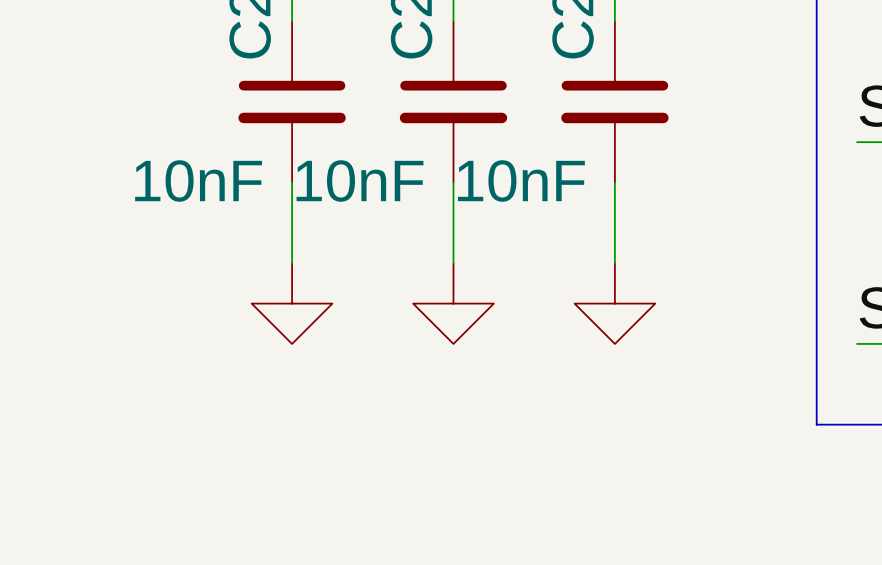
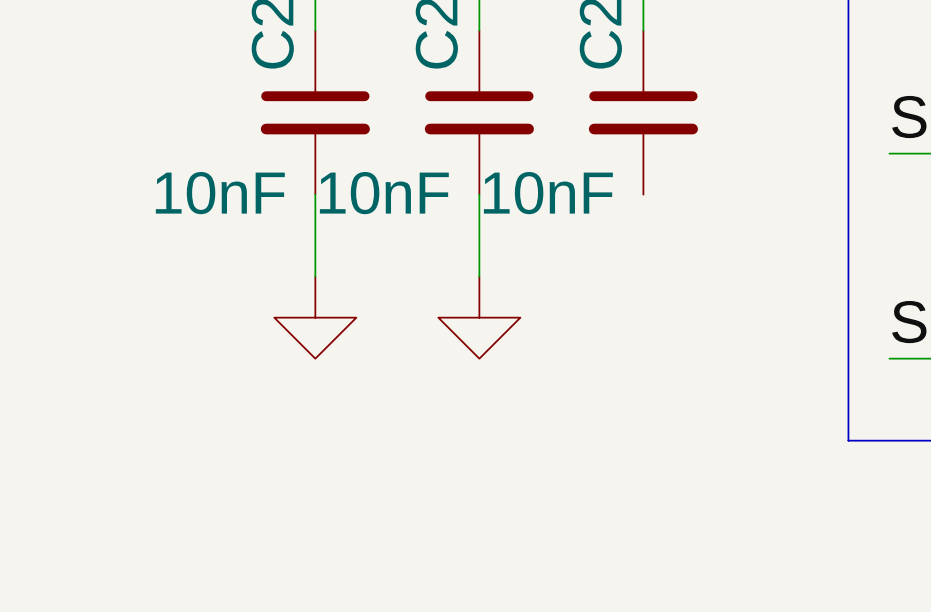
wire: (614, 182) (614, 263) -> none
power symbol: (614, 303) -> none

